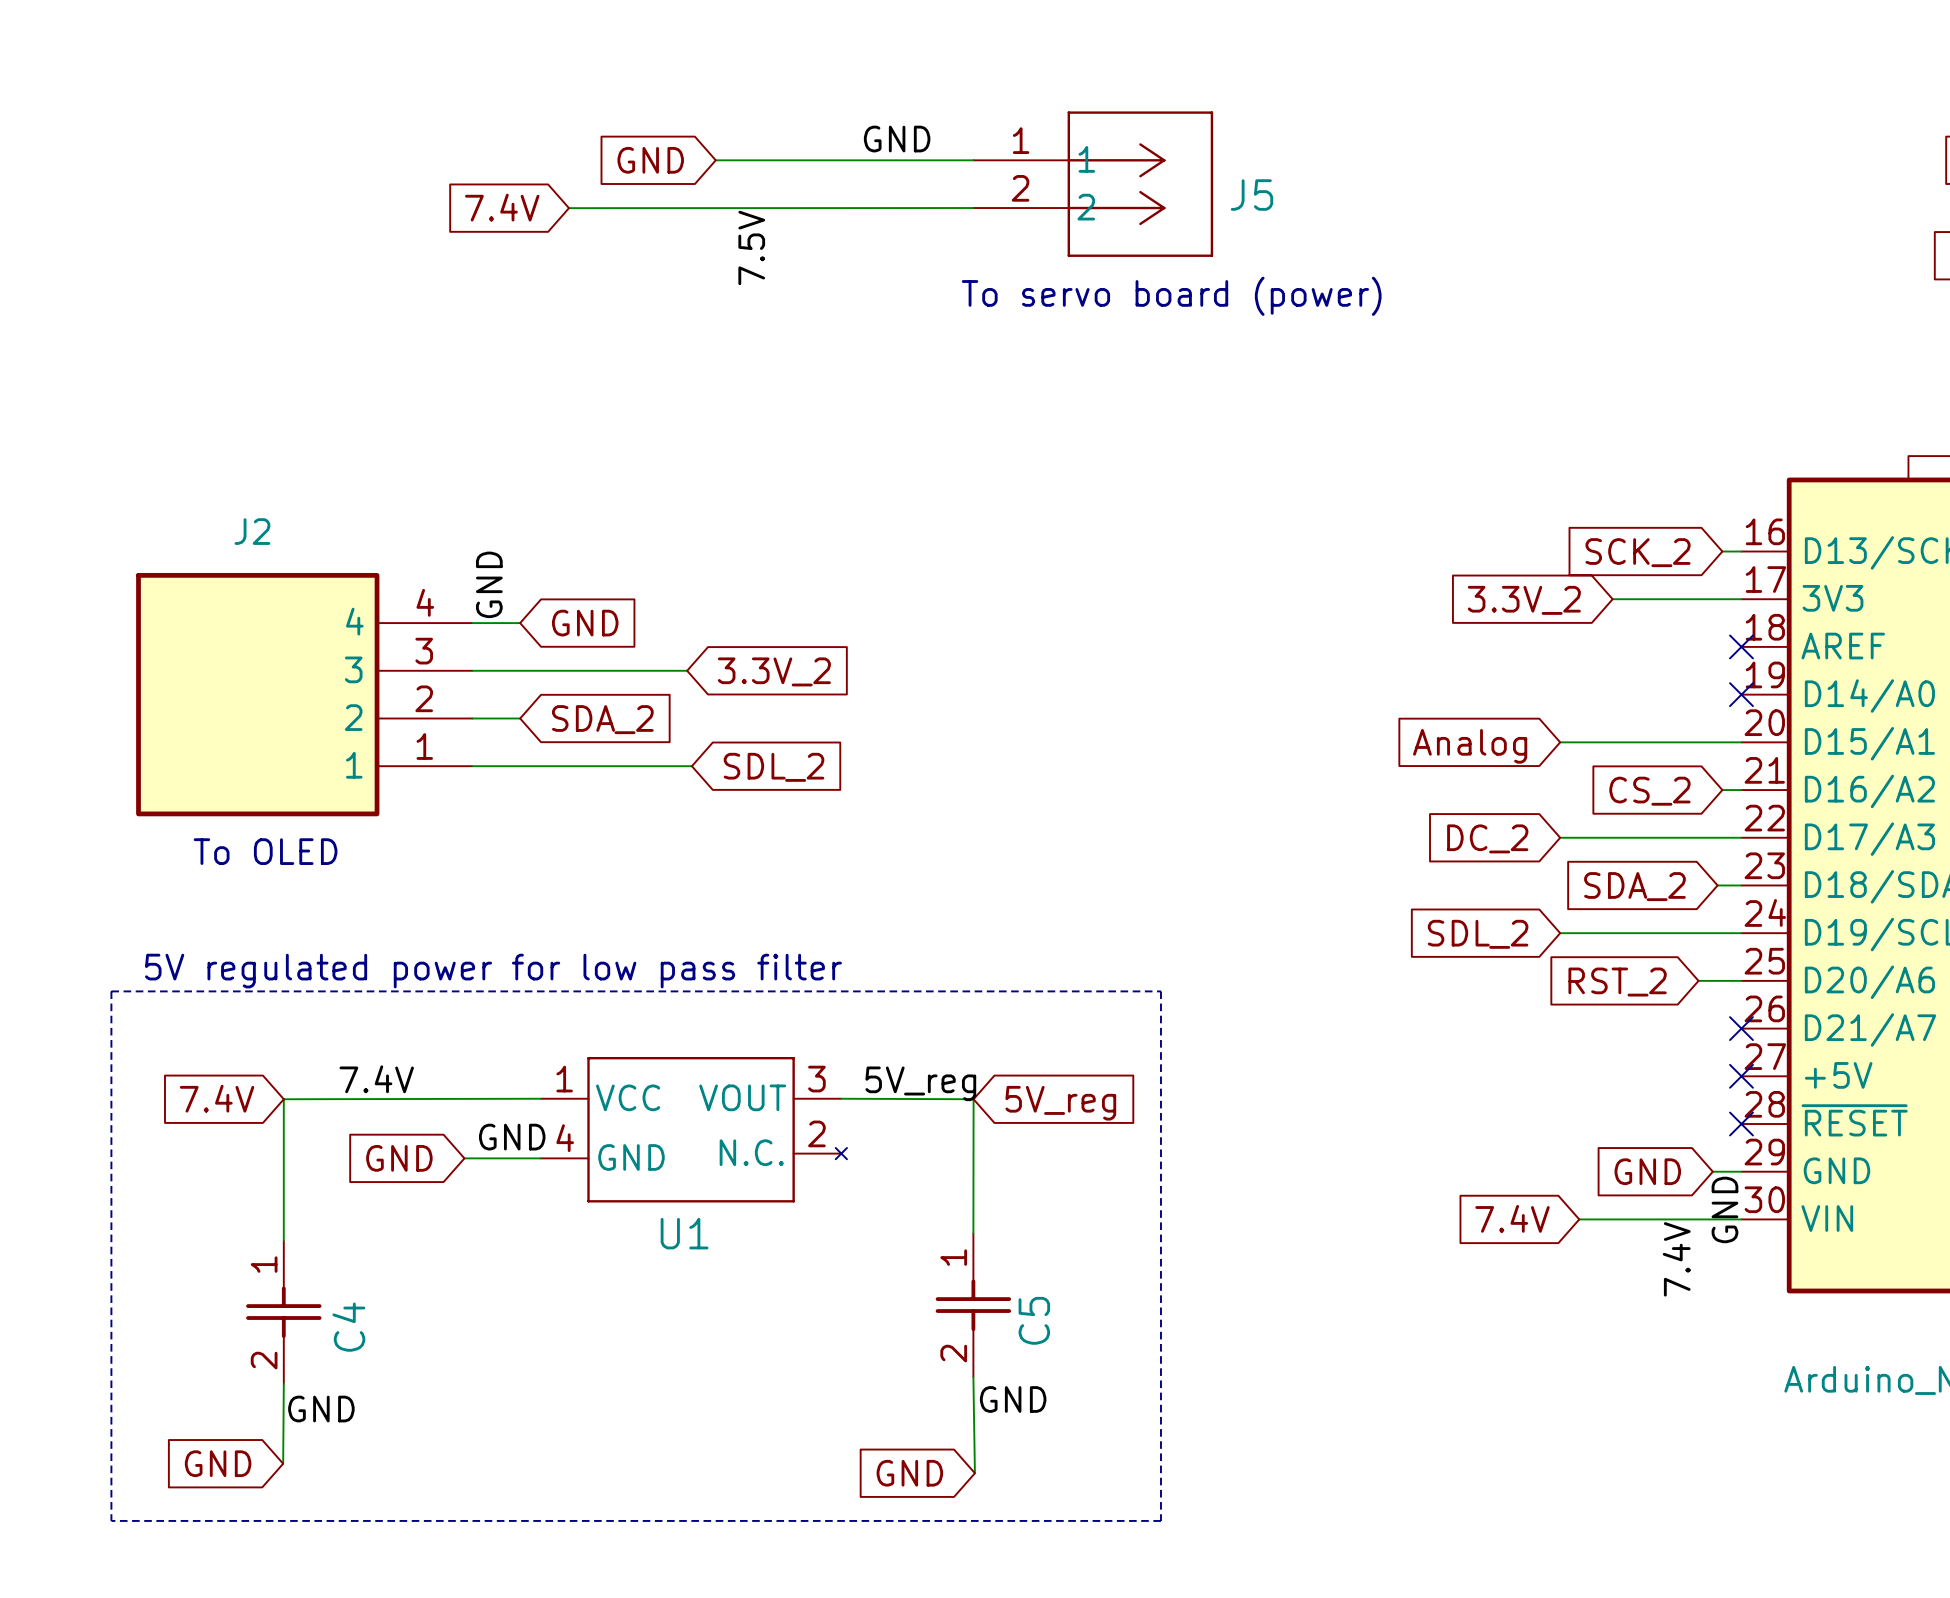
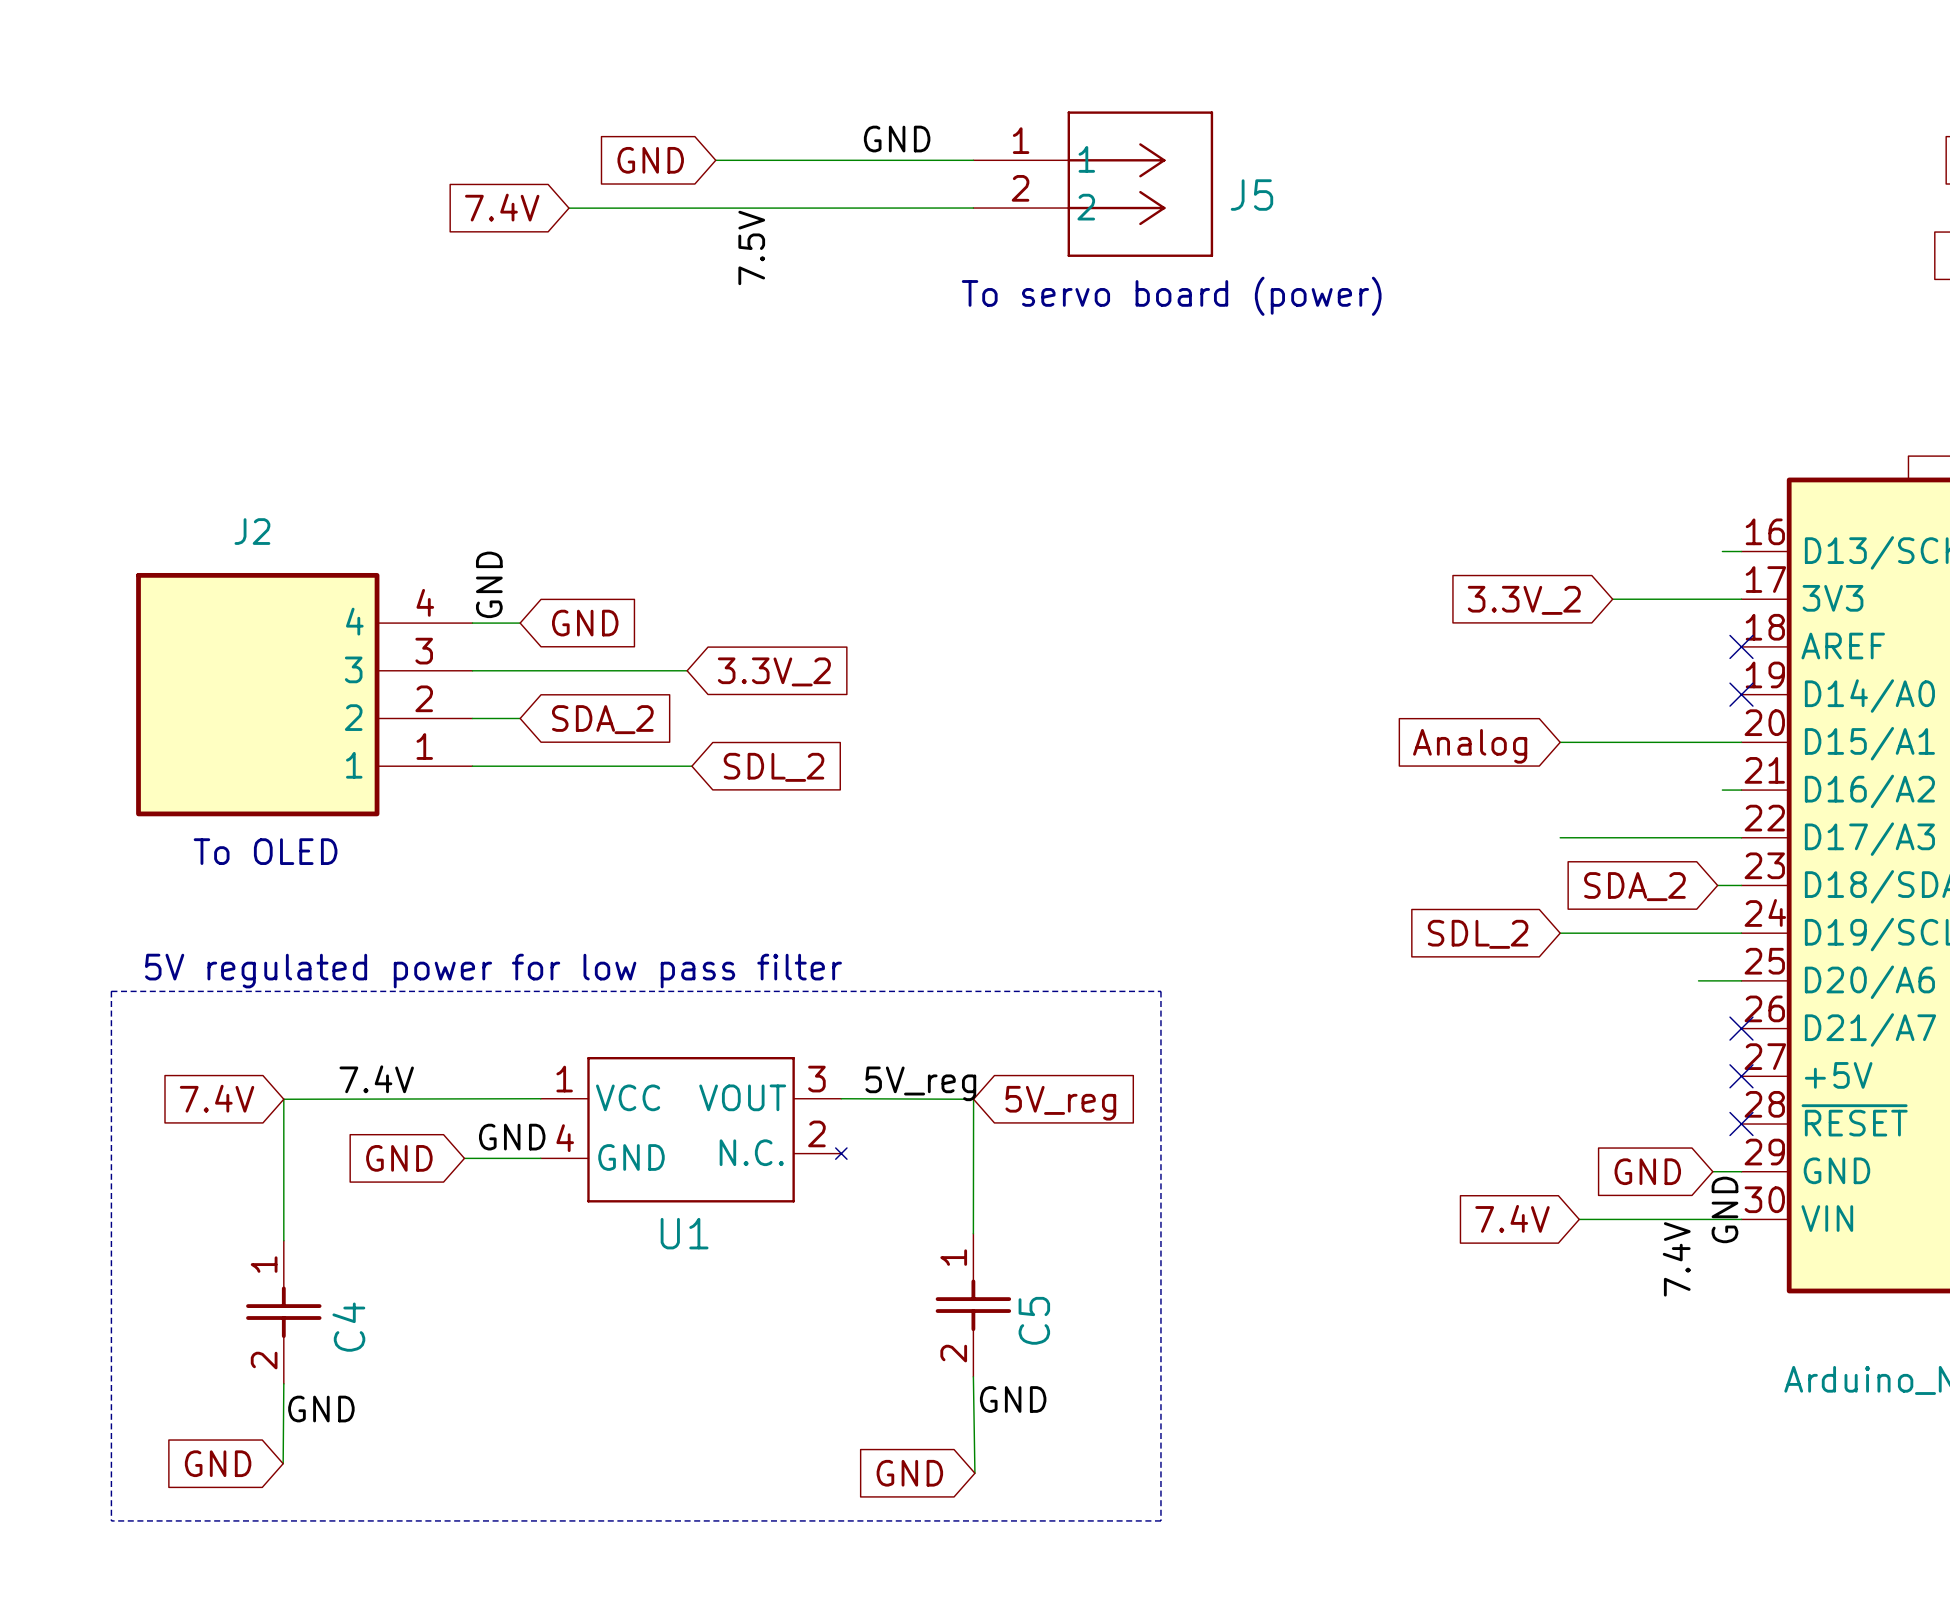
global label: SCK_2 (1638, 552) -> none
global label: CS_2 (1649, 791) -> none
global label: DC_2 (1487, 838) -> none
global label: RST_2 (1617, 982) -> none

